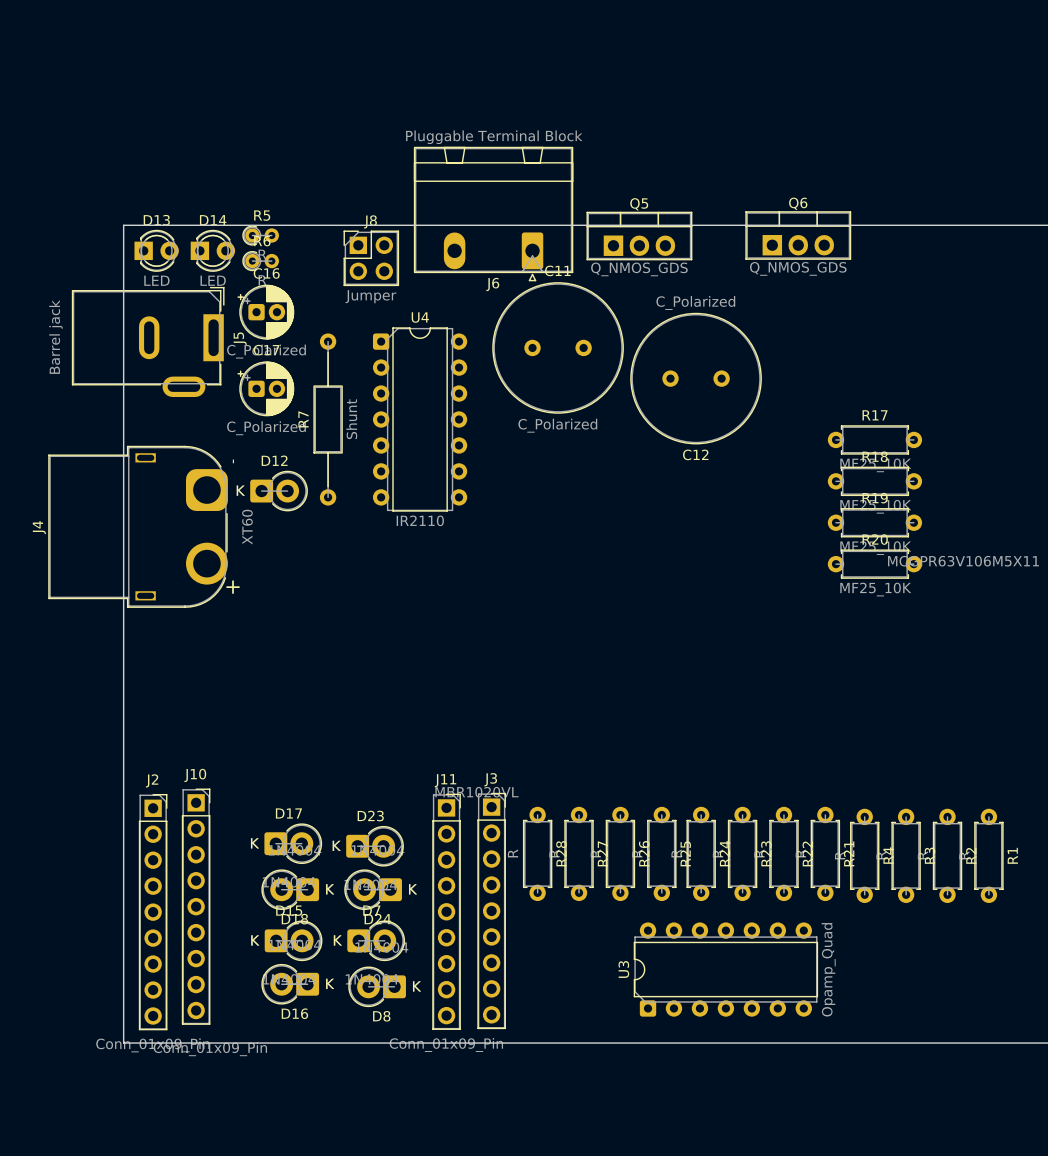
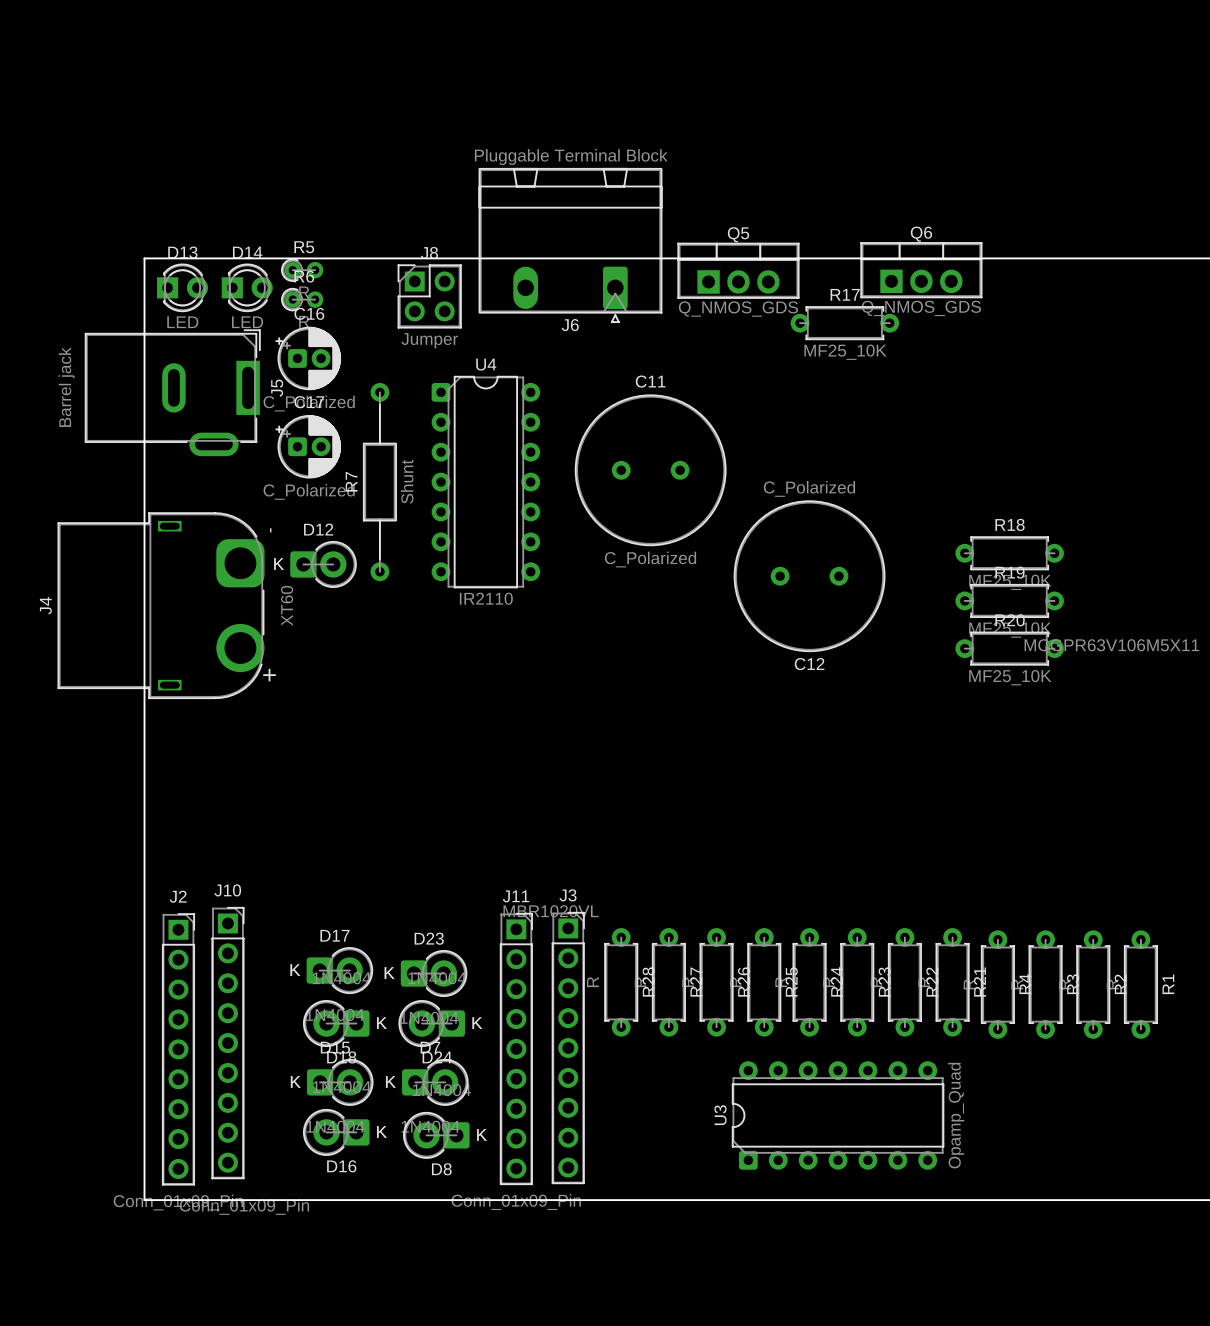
C11 position: (558, 347) -> (650, 470)
C12 position: (696, 378) -> (809, 576)
R17 position: (874, 439) -> (844, 323)

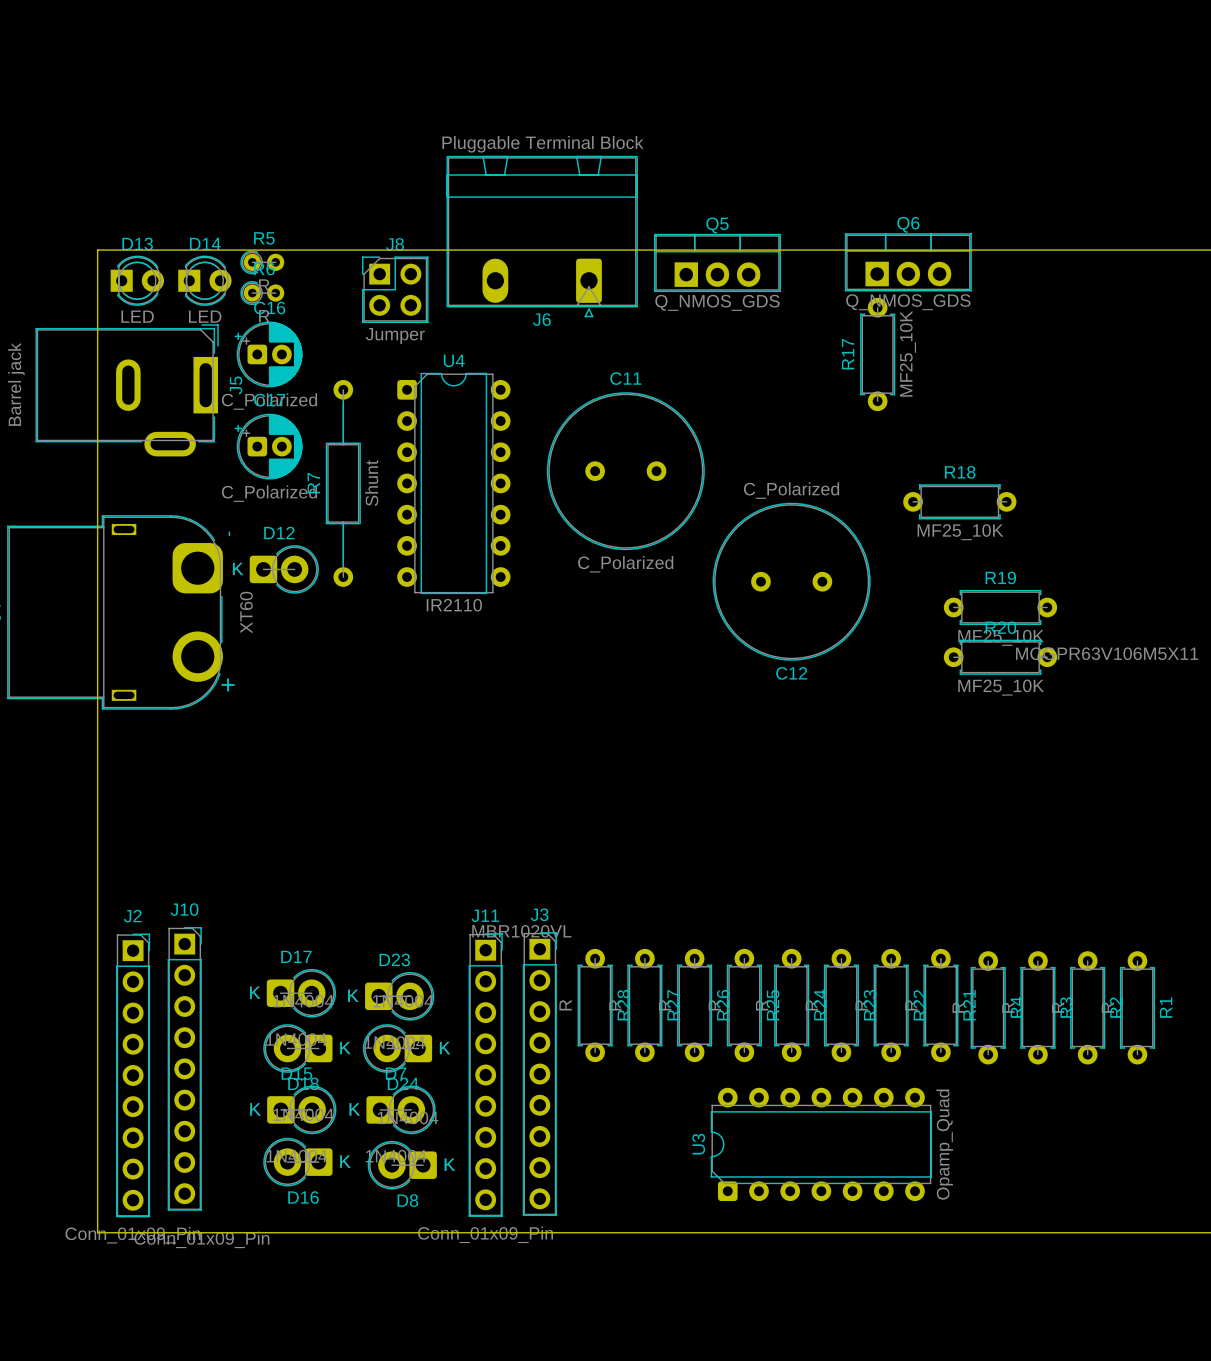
R17 name position: R17 (845, 294) -> R17 (848, 354)
R17 rotation: 0° (844, 323) -> 90° clockwise (877, 354)
R17 value position: MF25_10K (845, 352) -> MF25_10K (907, 353)
R18 position: (1009, 553) -> (959, 501)

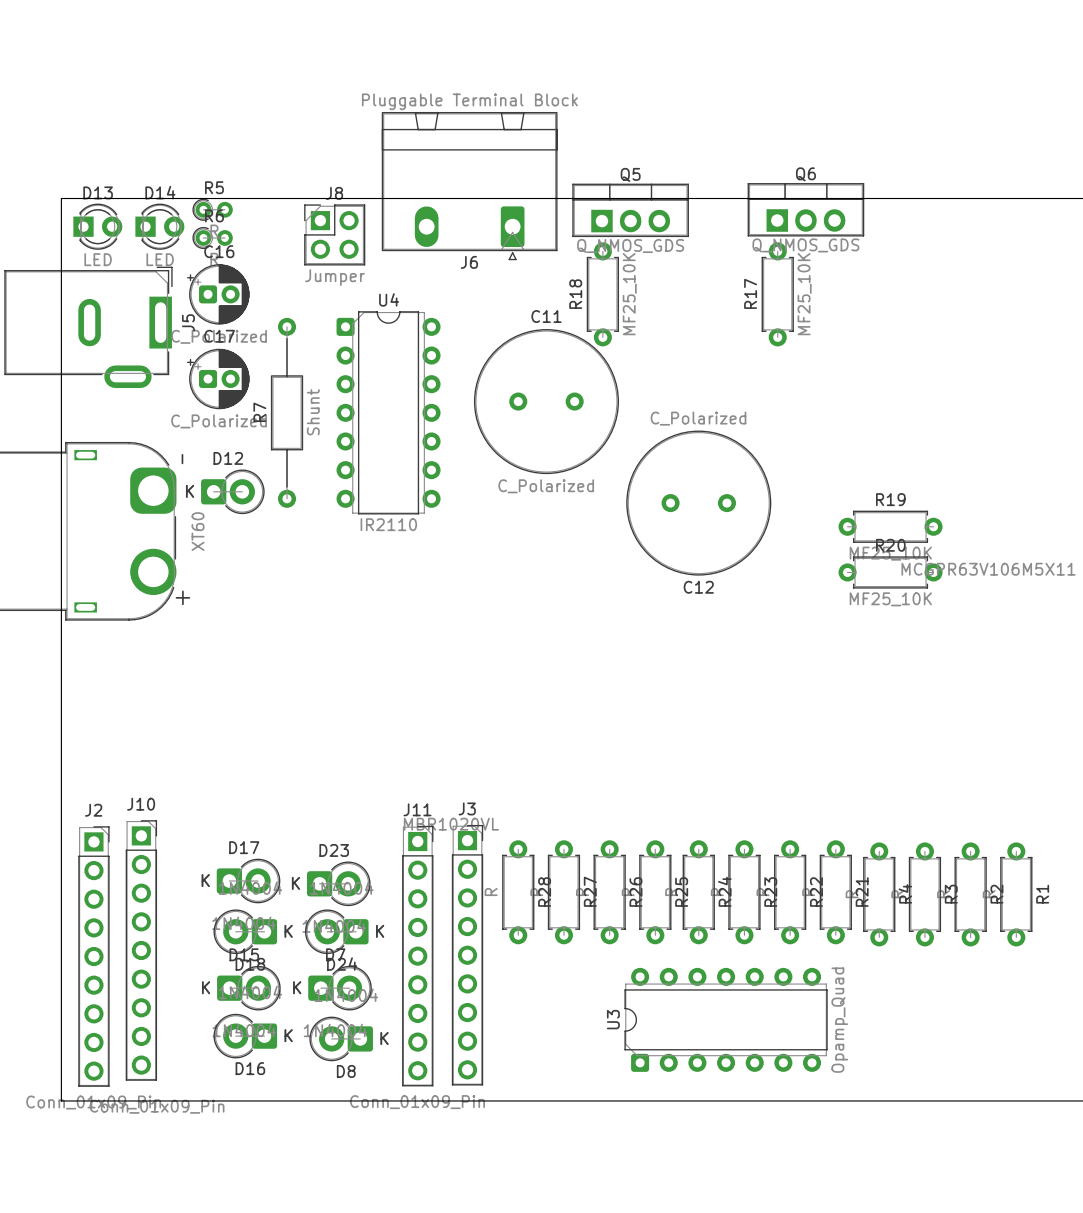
R18 name position: R18 (960, 472) -> R18 (575, 294)
R18 rotation: 0° (959, 501) -> 90° clockwise (602, 294)
R18 position: (959, 501) -> (602, 294)
R18 value position: MF25_10K (960, 532) -> MF25_10K (629, 294)

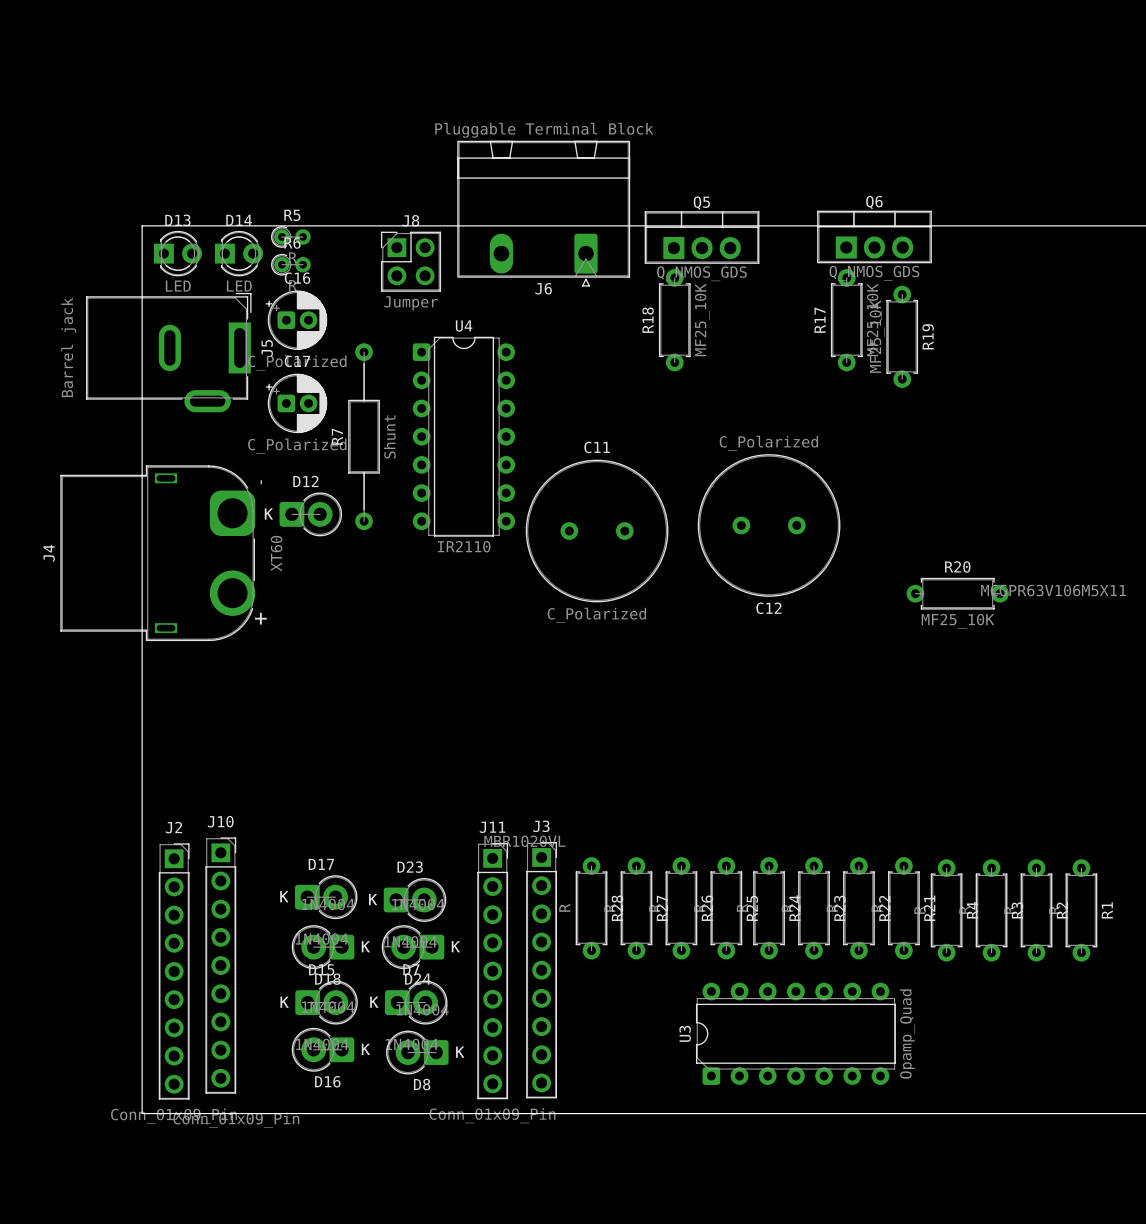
C11 position: (546, 401) -> (597, 531)
R19 rotation: 0° (890, 526) -> 90° clockwise (902, 336)
R19 position: (890, 526) -> (902, 336)

